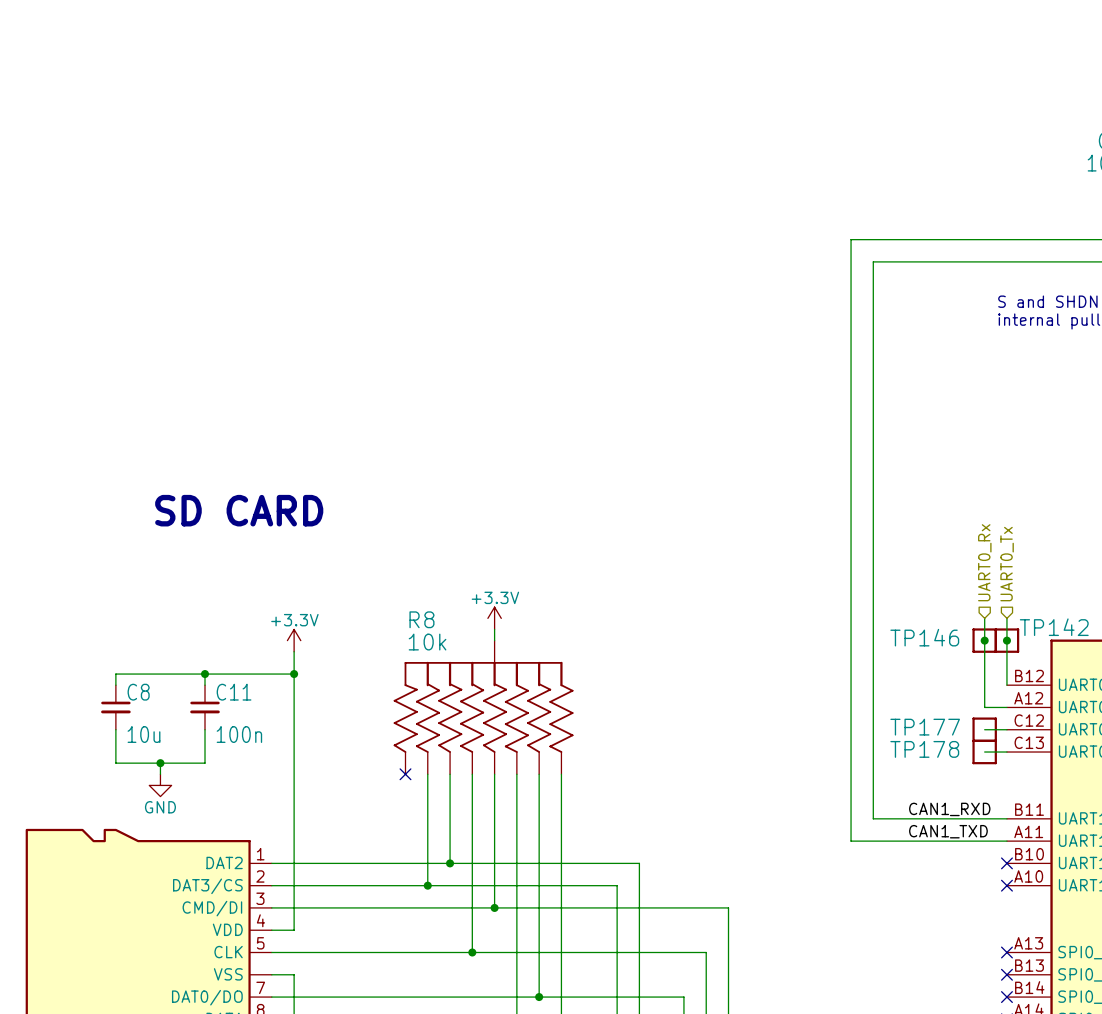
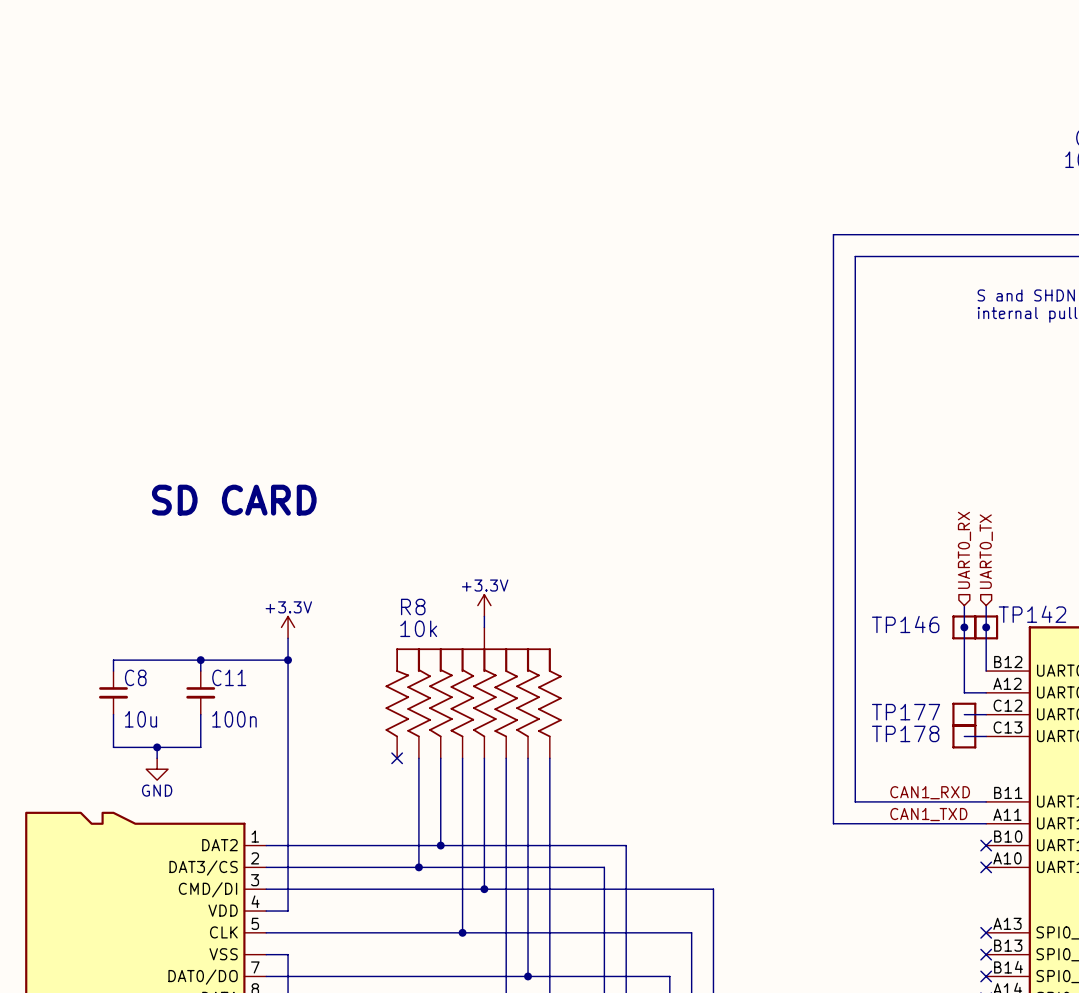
hierarchical label: UART0_Rx (984, 562) -> UART0_RX (964, 550)
hierarchical label: UART0_Tx (1007, 564) -> UART0_TX (986, 551)

